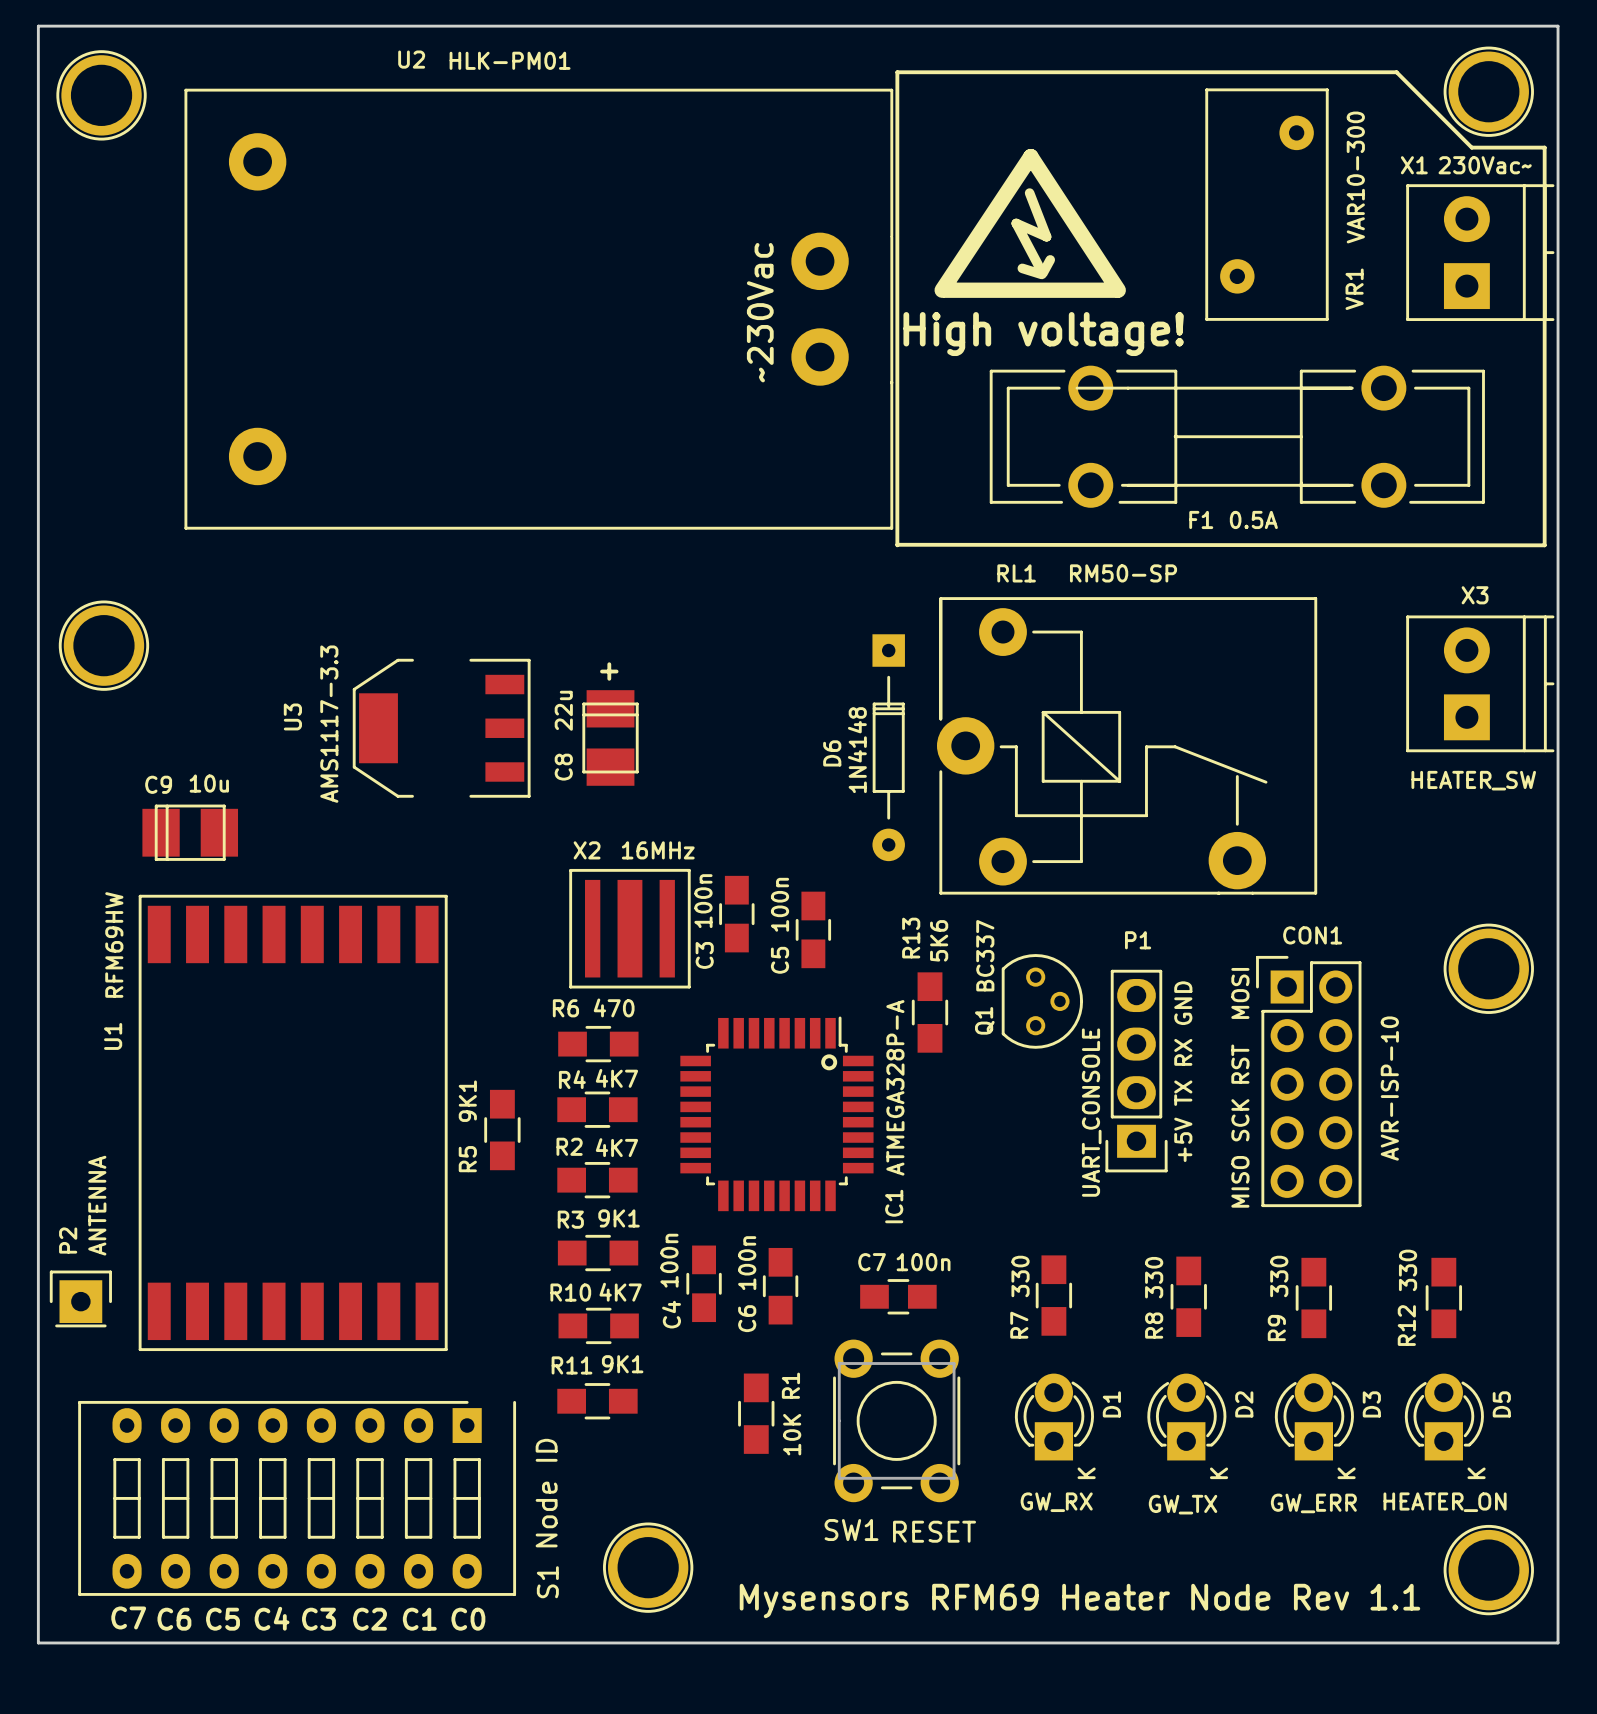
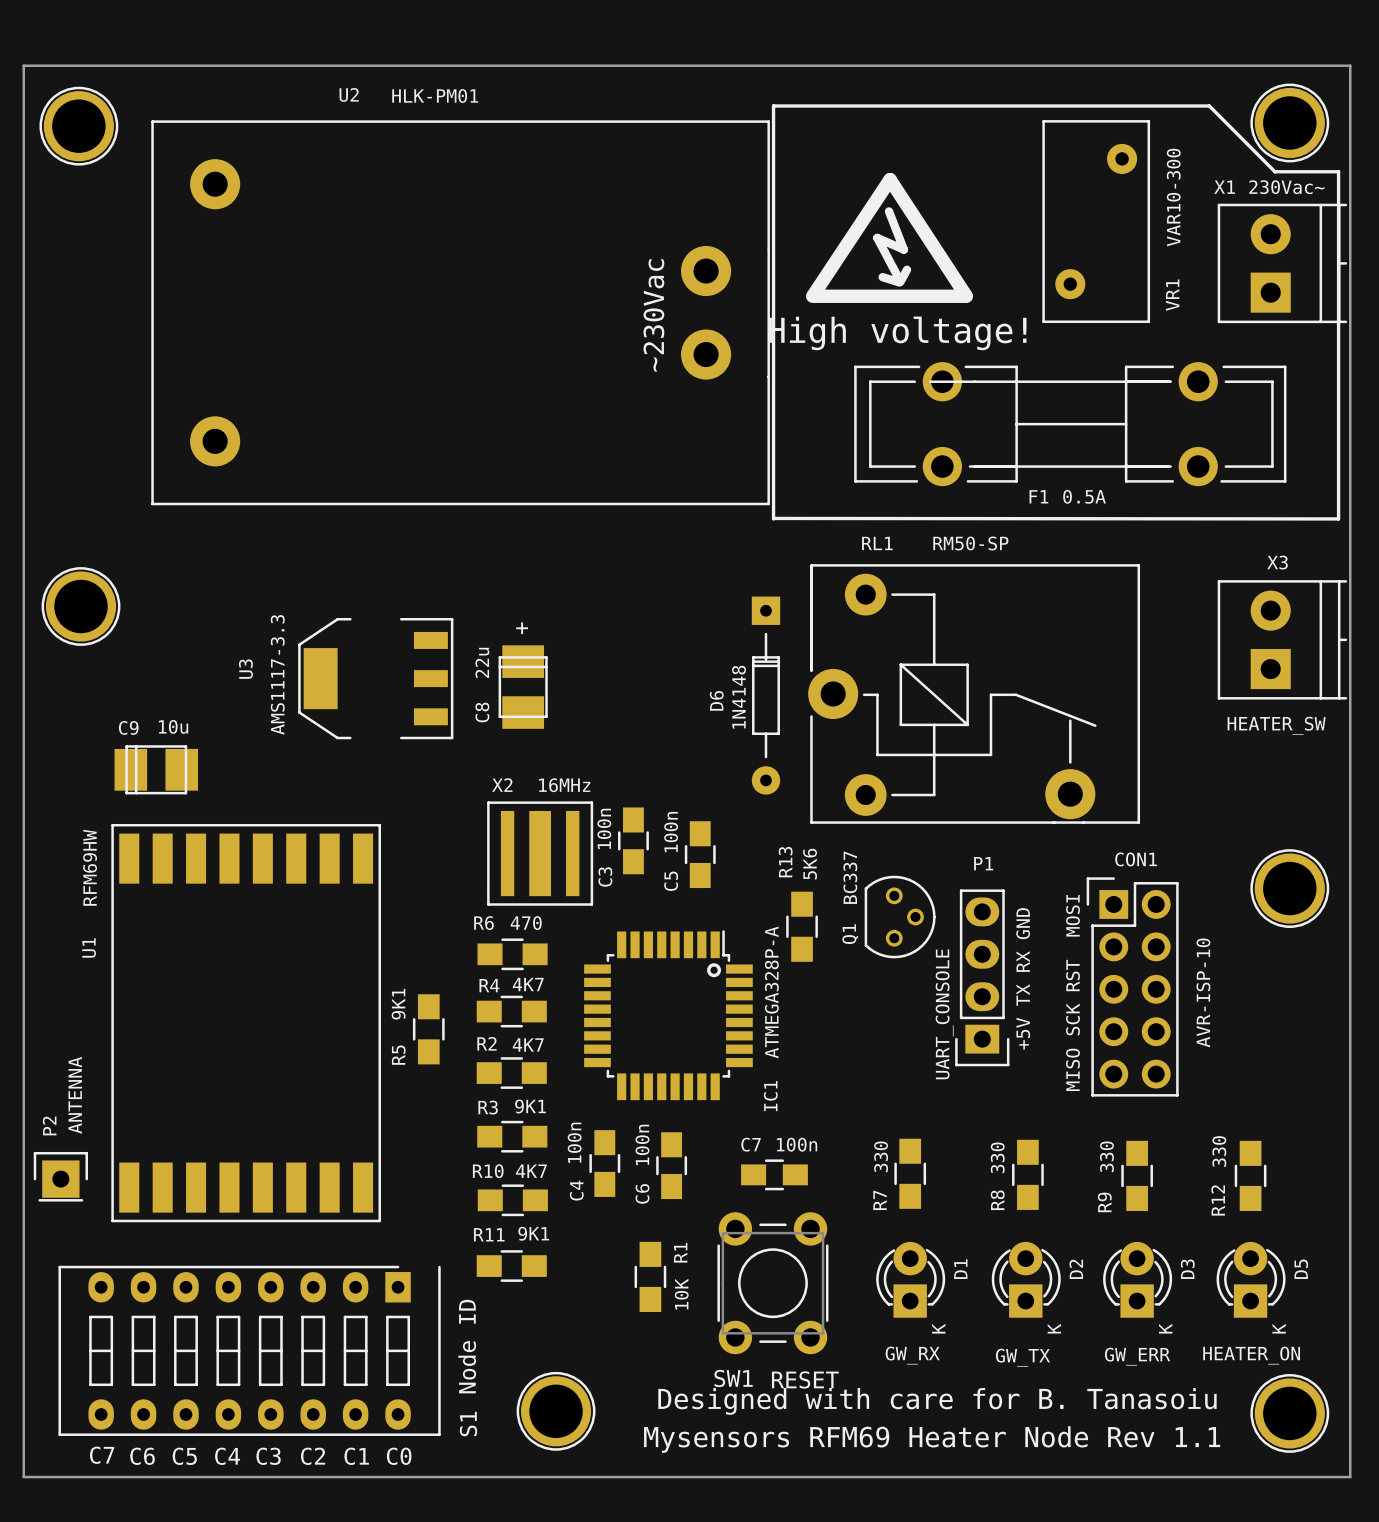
text: none -> Designed with care for B. Tanasoiu (937, 1401)

